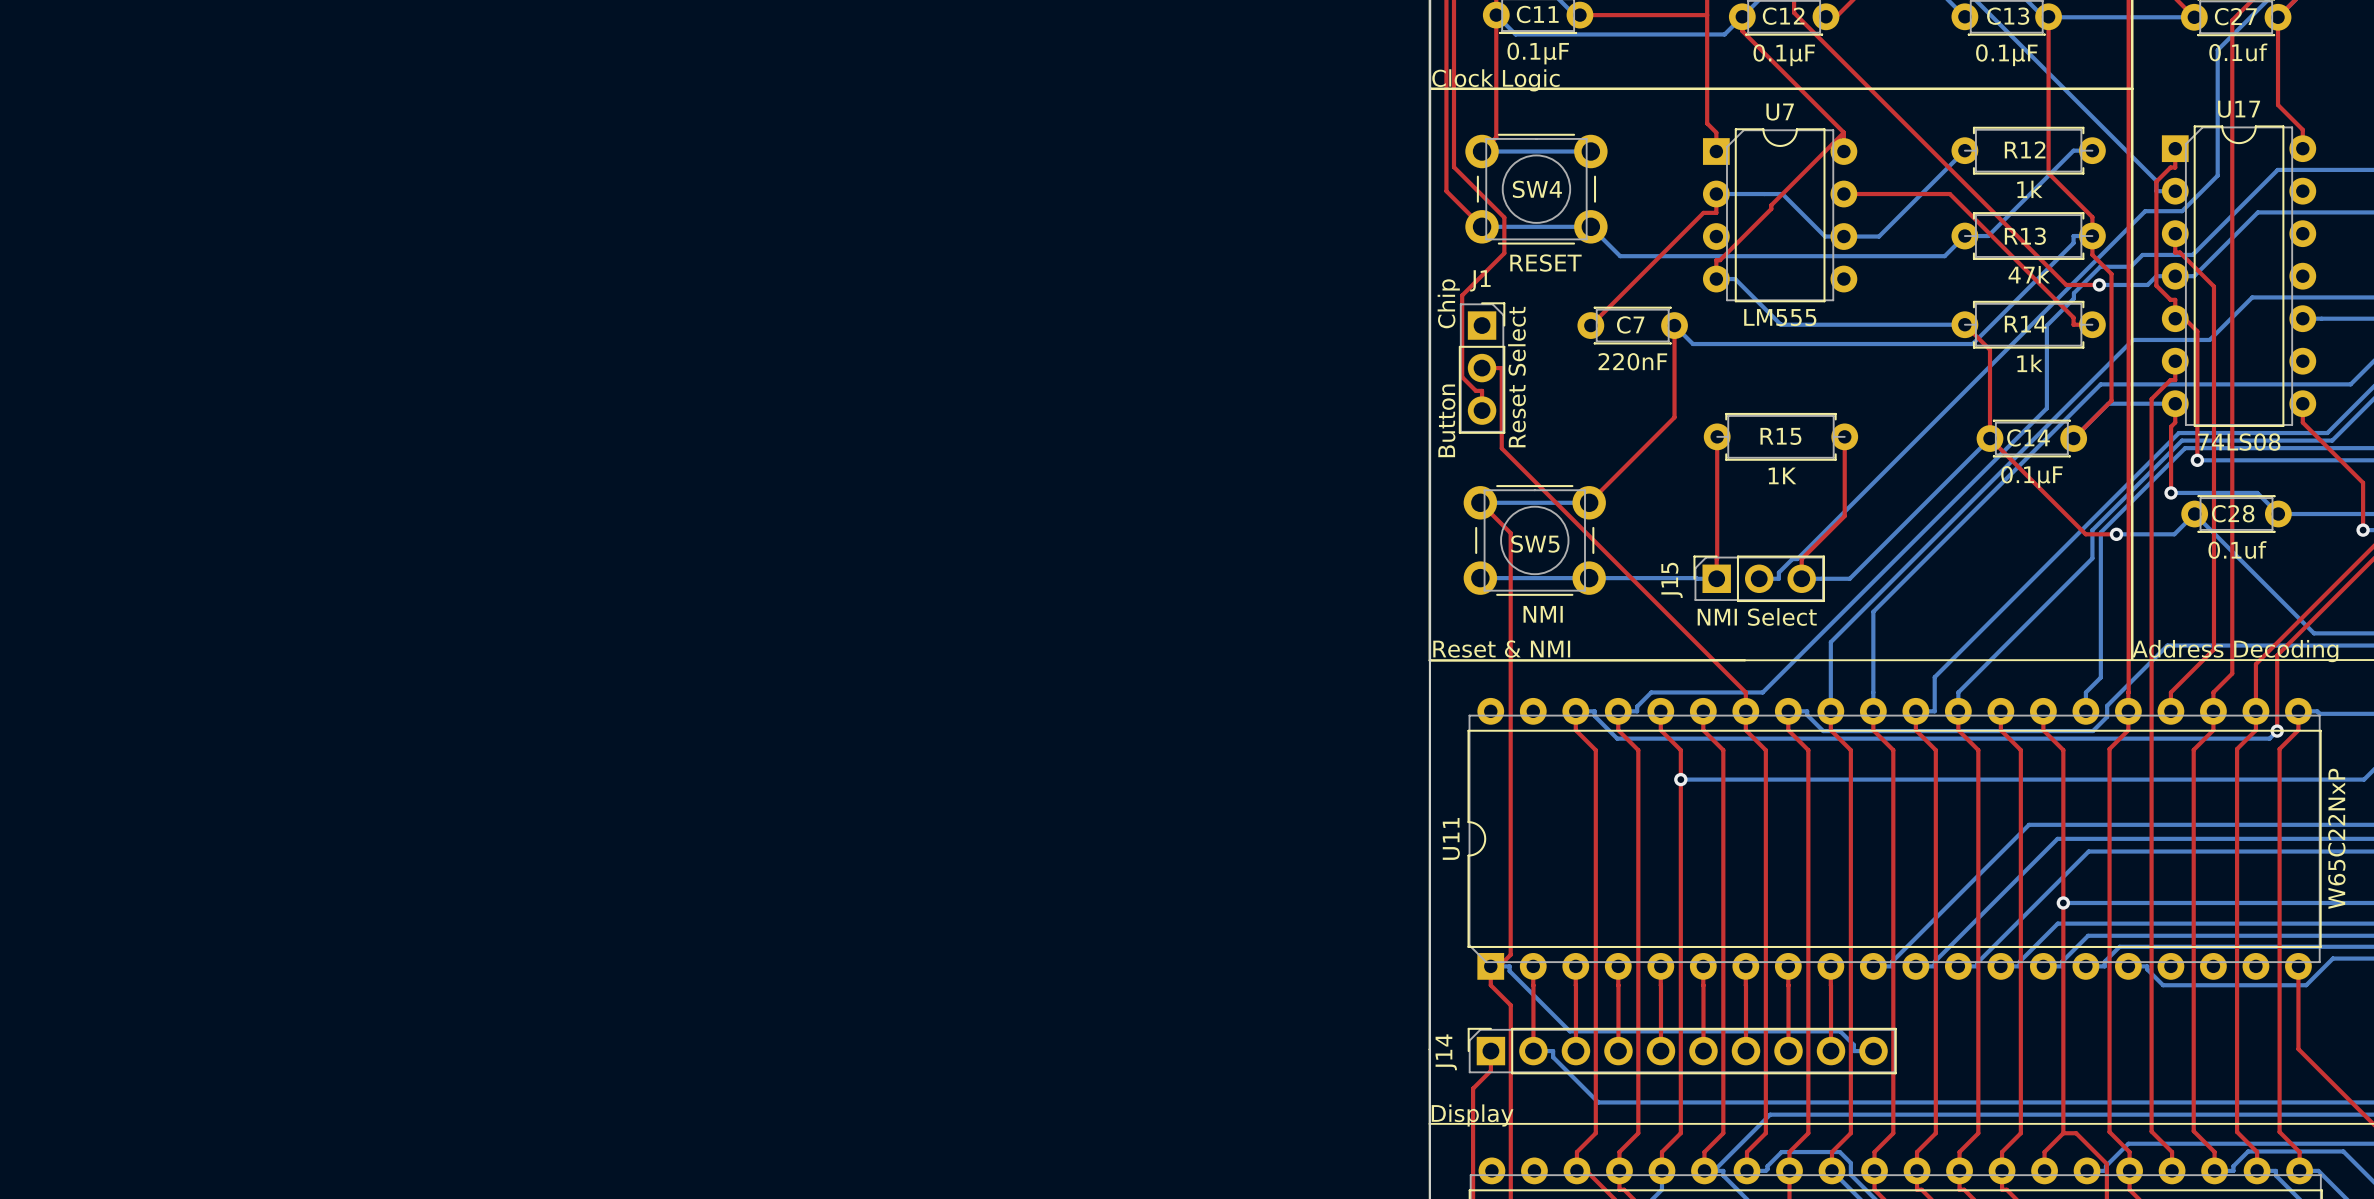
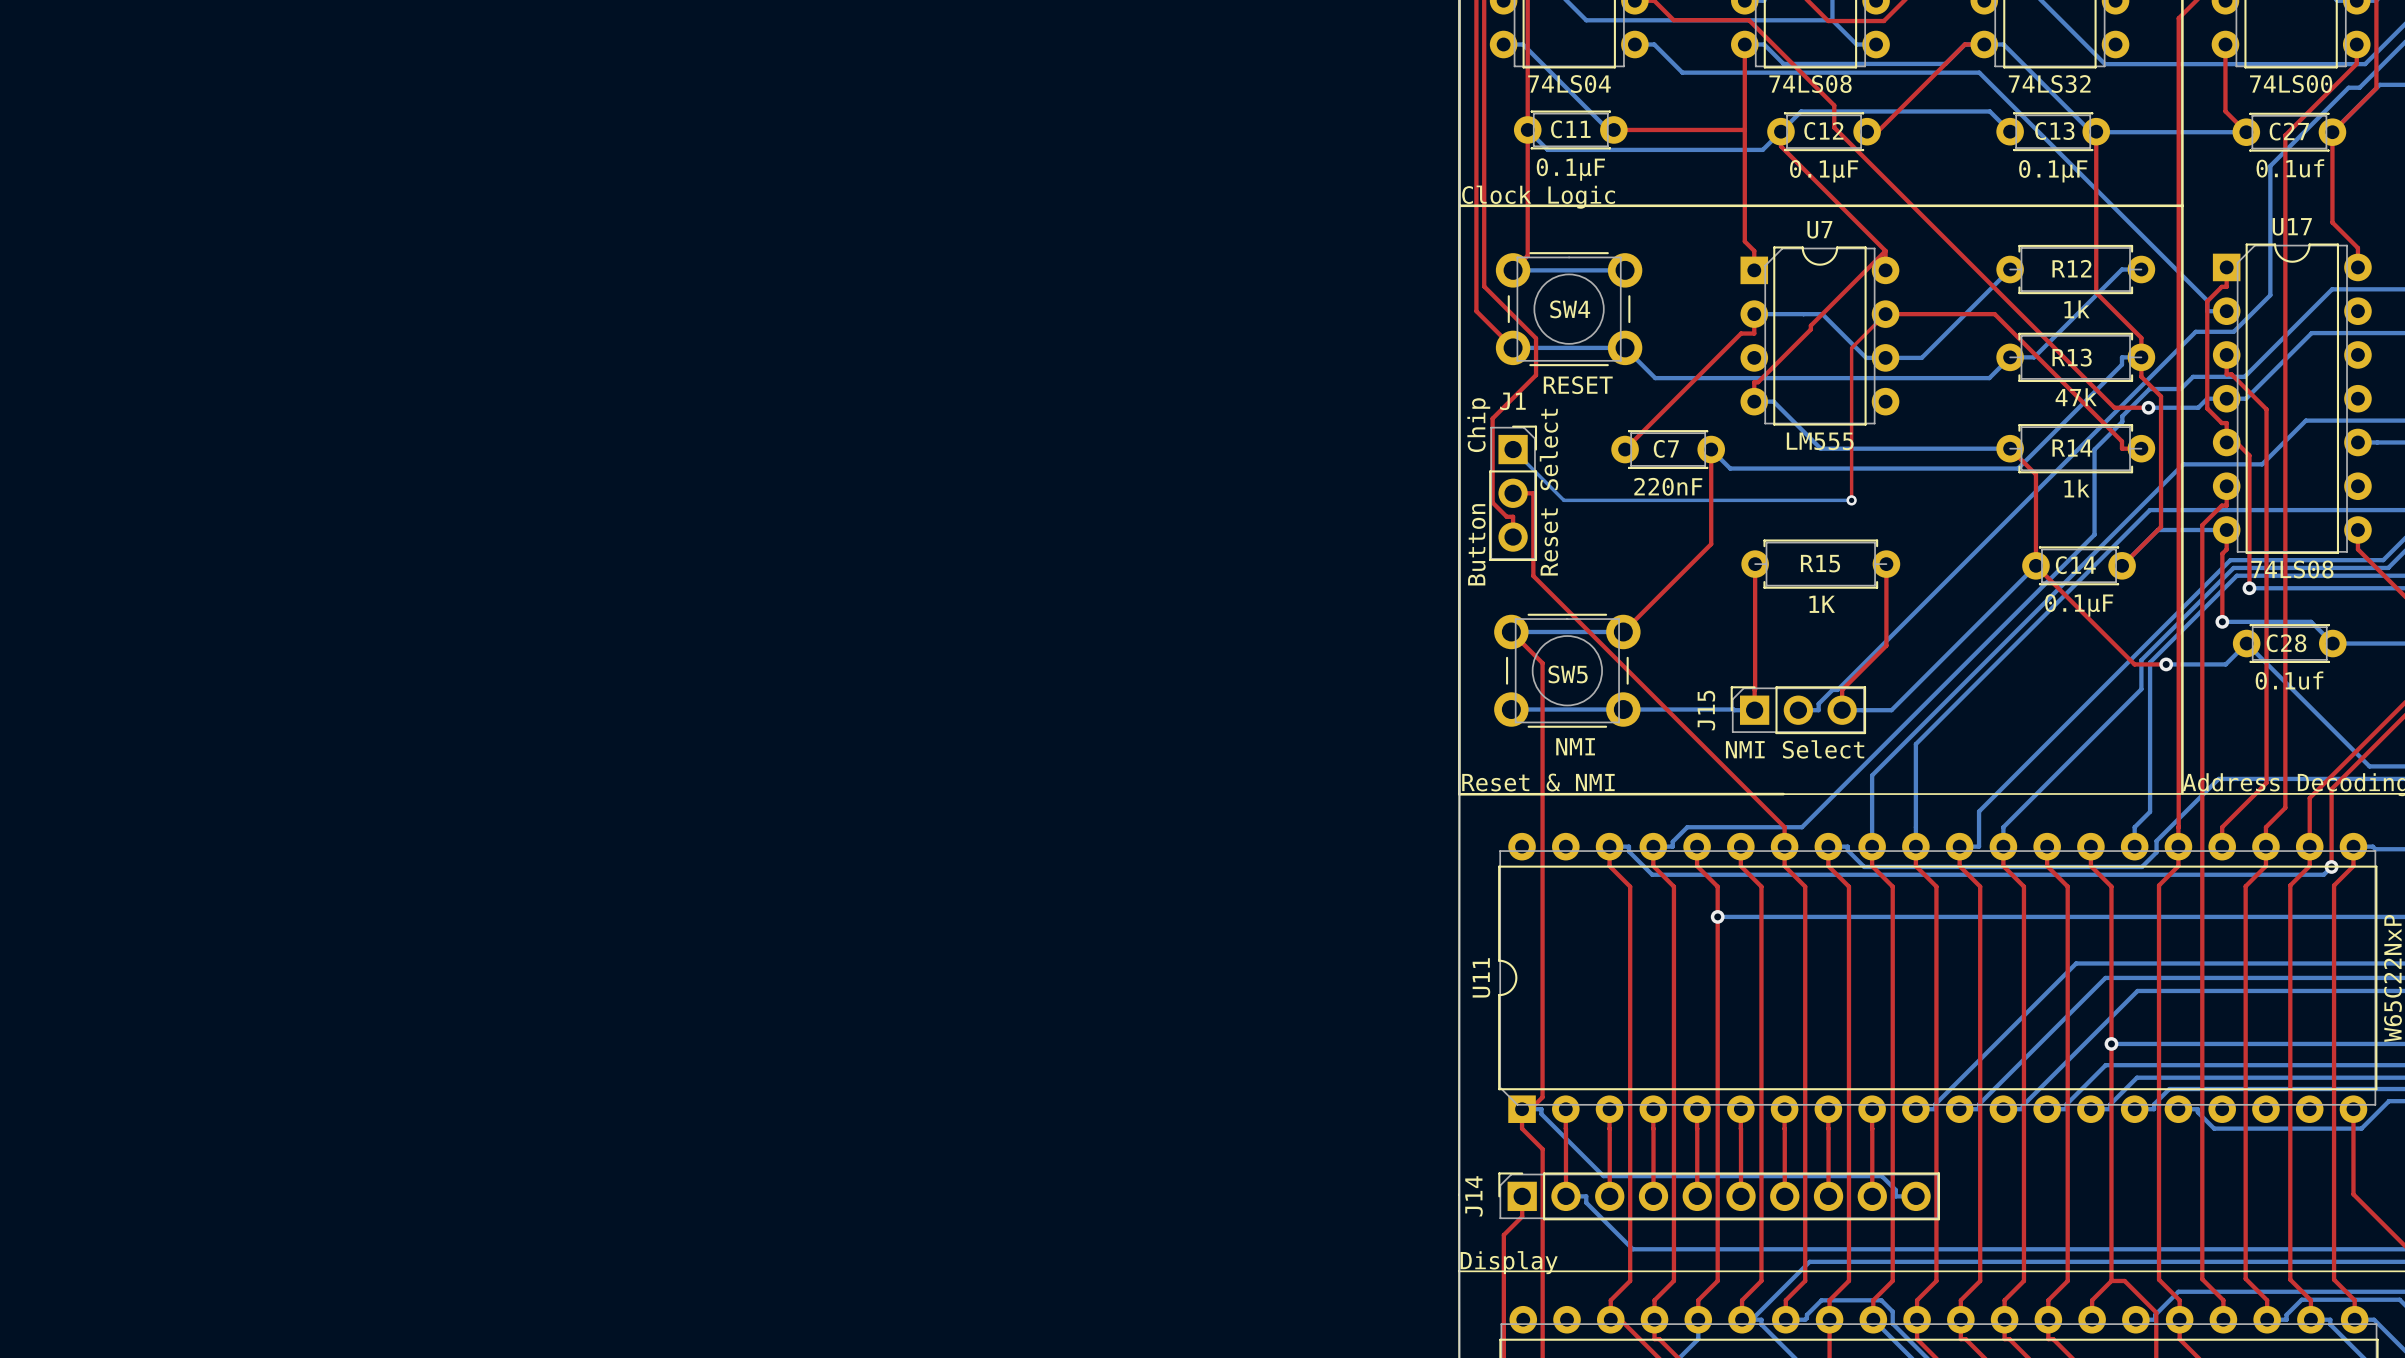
top track: none -> (1885, 314) (1851, 348) (1851, 500)
bottom track: none -> (1513, 449) (1563, 500) (1851, 500)
via: none -> (1851, 500)

